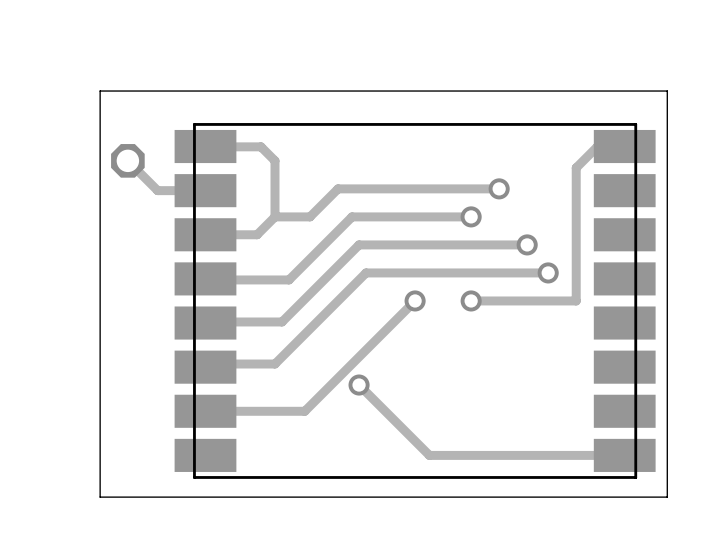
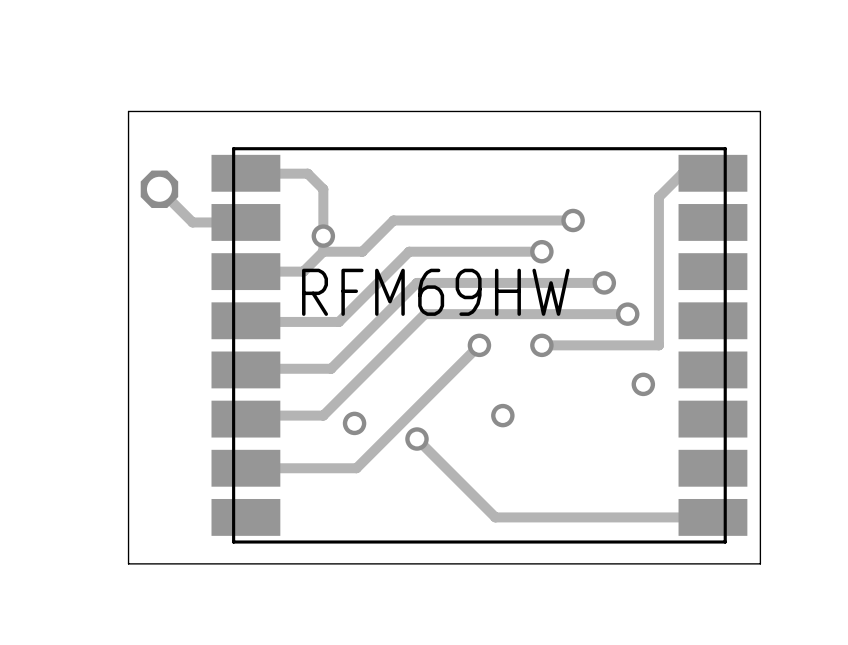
via: none -> (323, 236)
text: none -> RFM69HW (435, 292)
via: none -> (643, 384)
via: none -> (502, 415)
via: none -> (354, 423)

